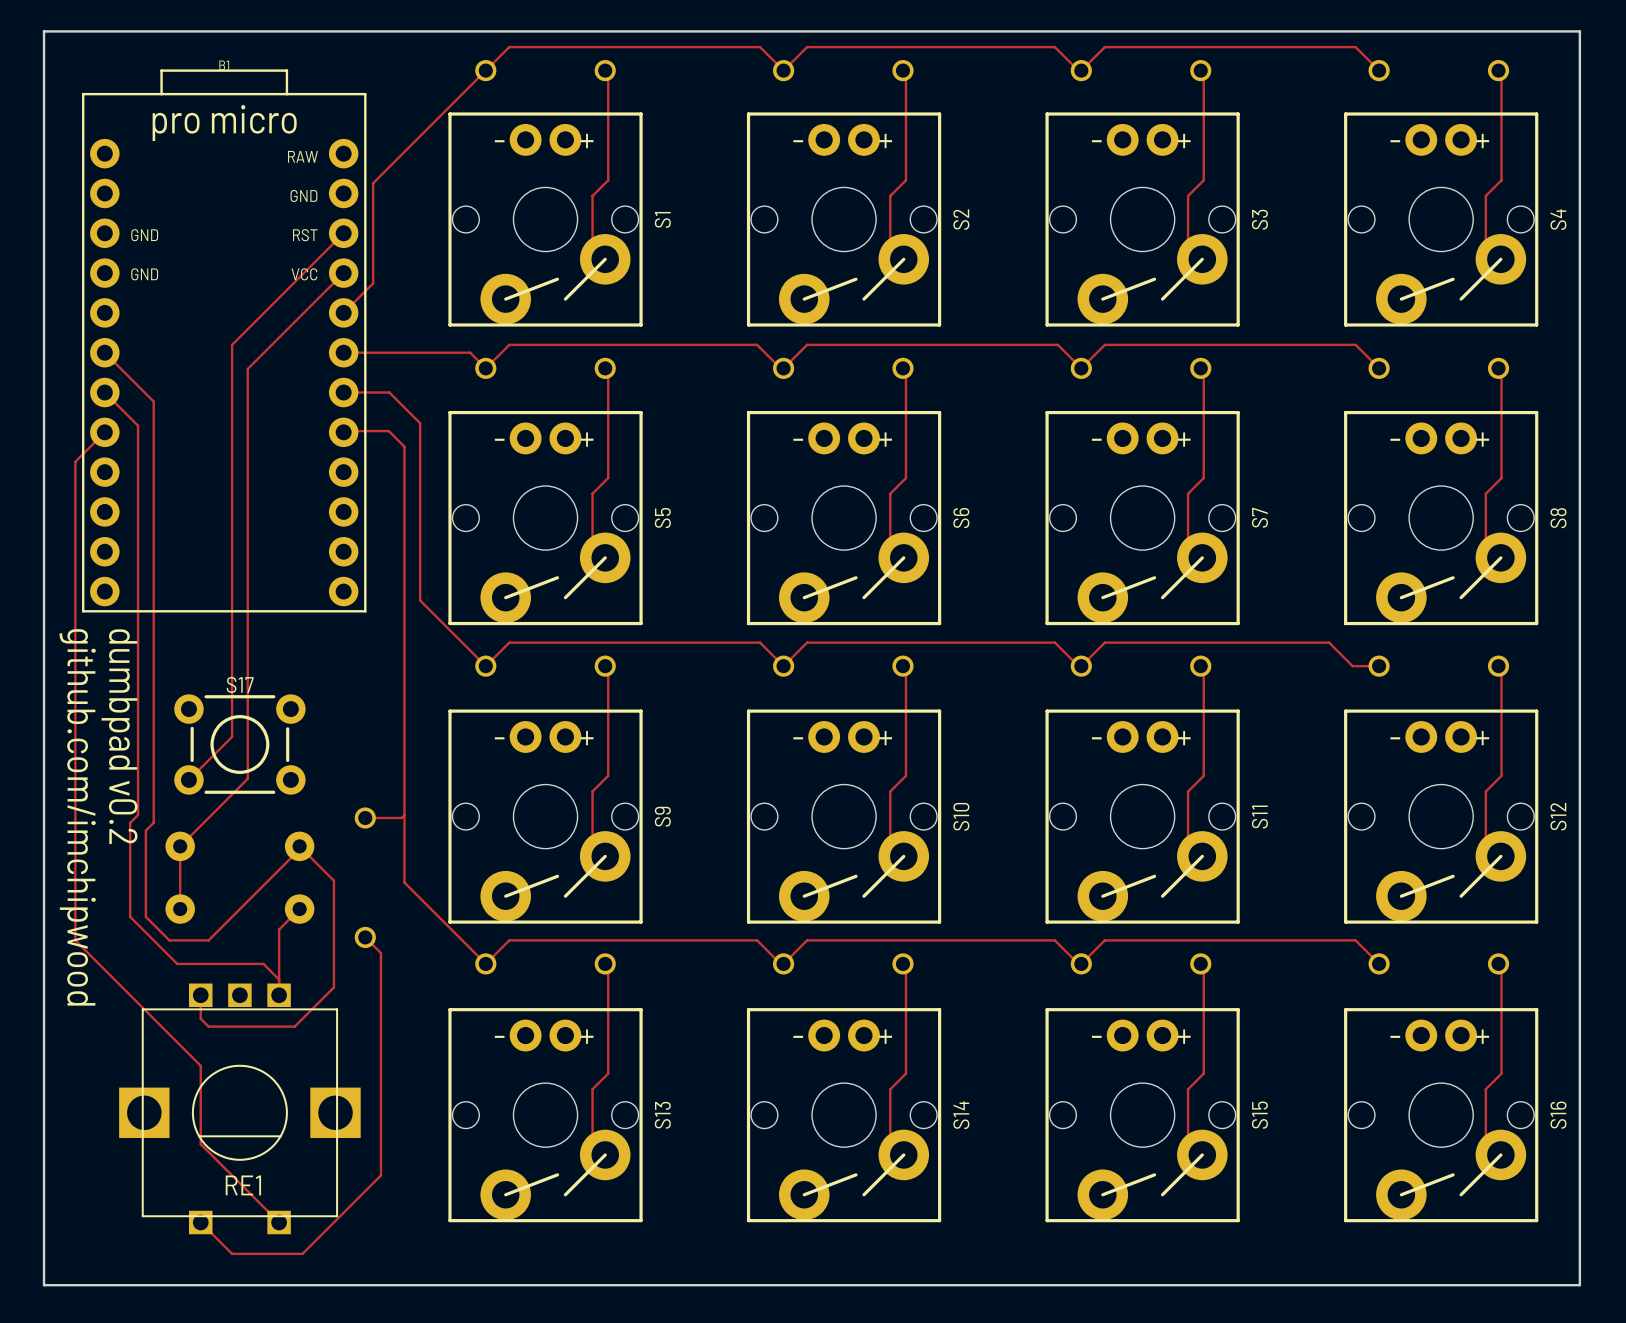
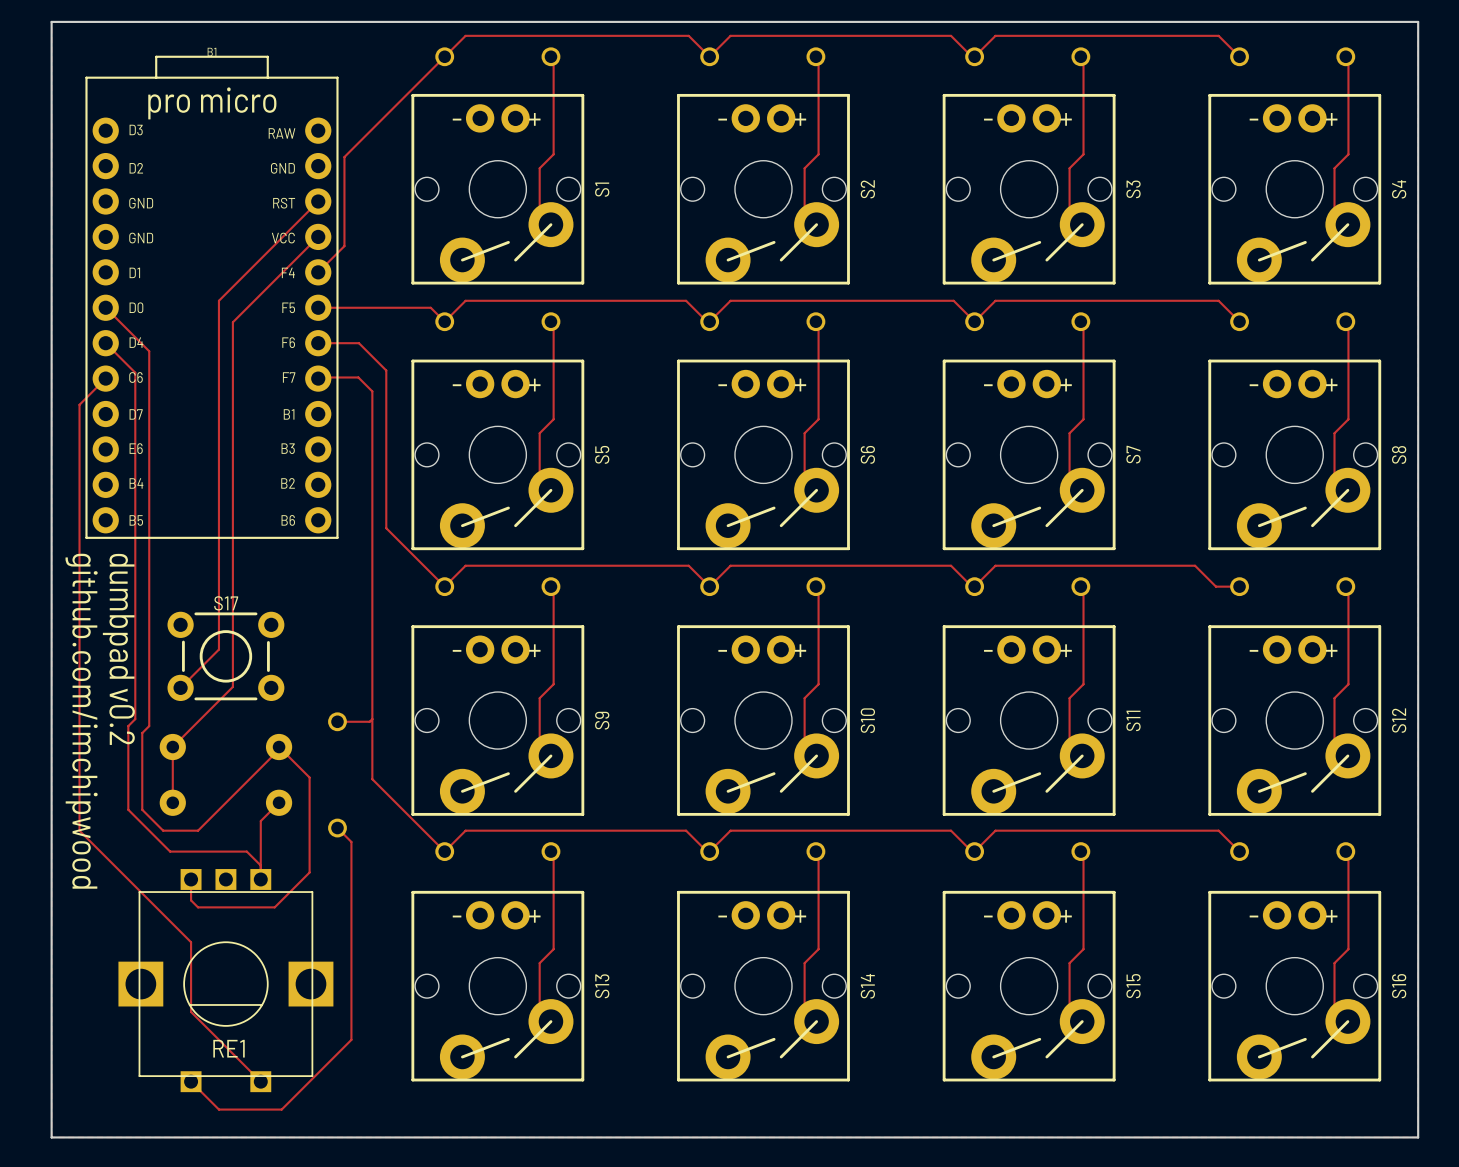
text: none -> D3 (136, 130)
text: none -> D2 (136, 168)
text: none -> D1 (134, 272)
text: none -> F4 (288, 272)
text: none -> D0 (136, 307)
text: none -> F5 (288, 307)
text: none -> D4 (136, 342)
text: none -> F6 (288, 342)
text: none -> C6 (136, 377)
text: none -> F7 (289, 377)
text: none -> D7 (136, 414)
text: none -> B1 (289, 414)
text: none -> E6 (136, 448)
text: none -> B3 (288, 448)
text: none -> B4 (136, 483)
text: none -> B2 (288, 483)
text: none -> B5 (136, 520)
text: none -> B6 (288, 520)

